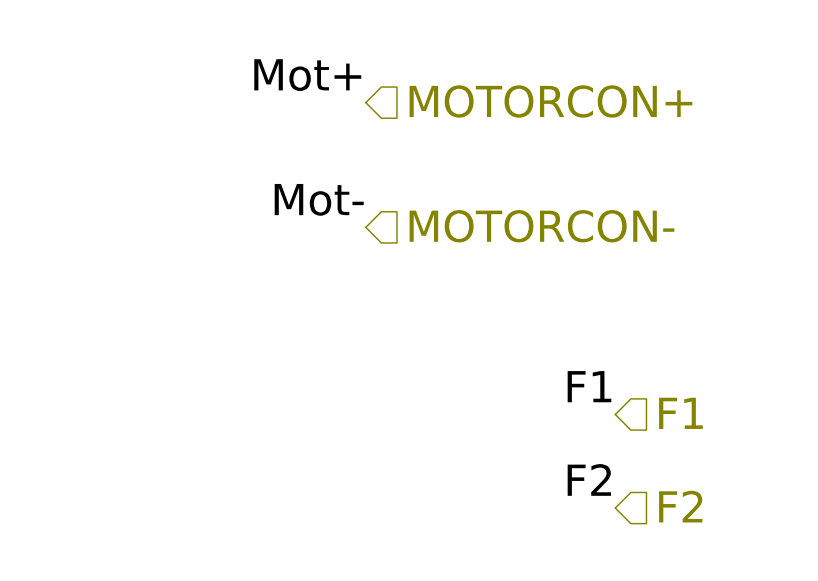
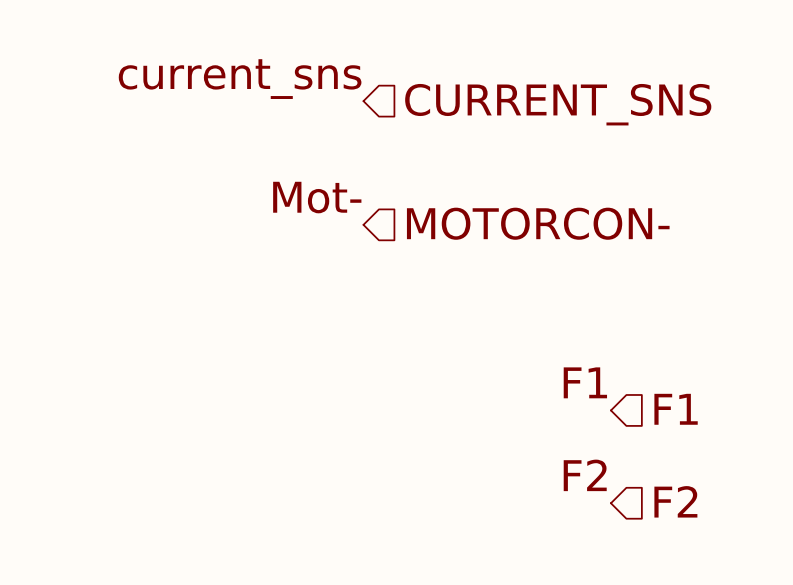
label: Mot+ (307, 75) -> current_sns (240, 79)
hierarchical label: MOTORCON+ (550, 101) -> CURRENT_SNS (558, 104)

